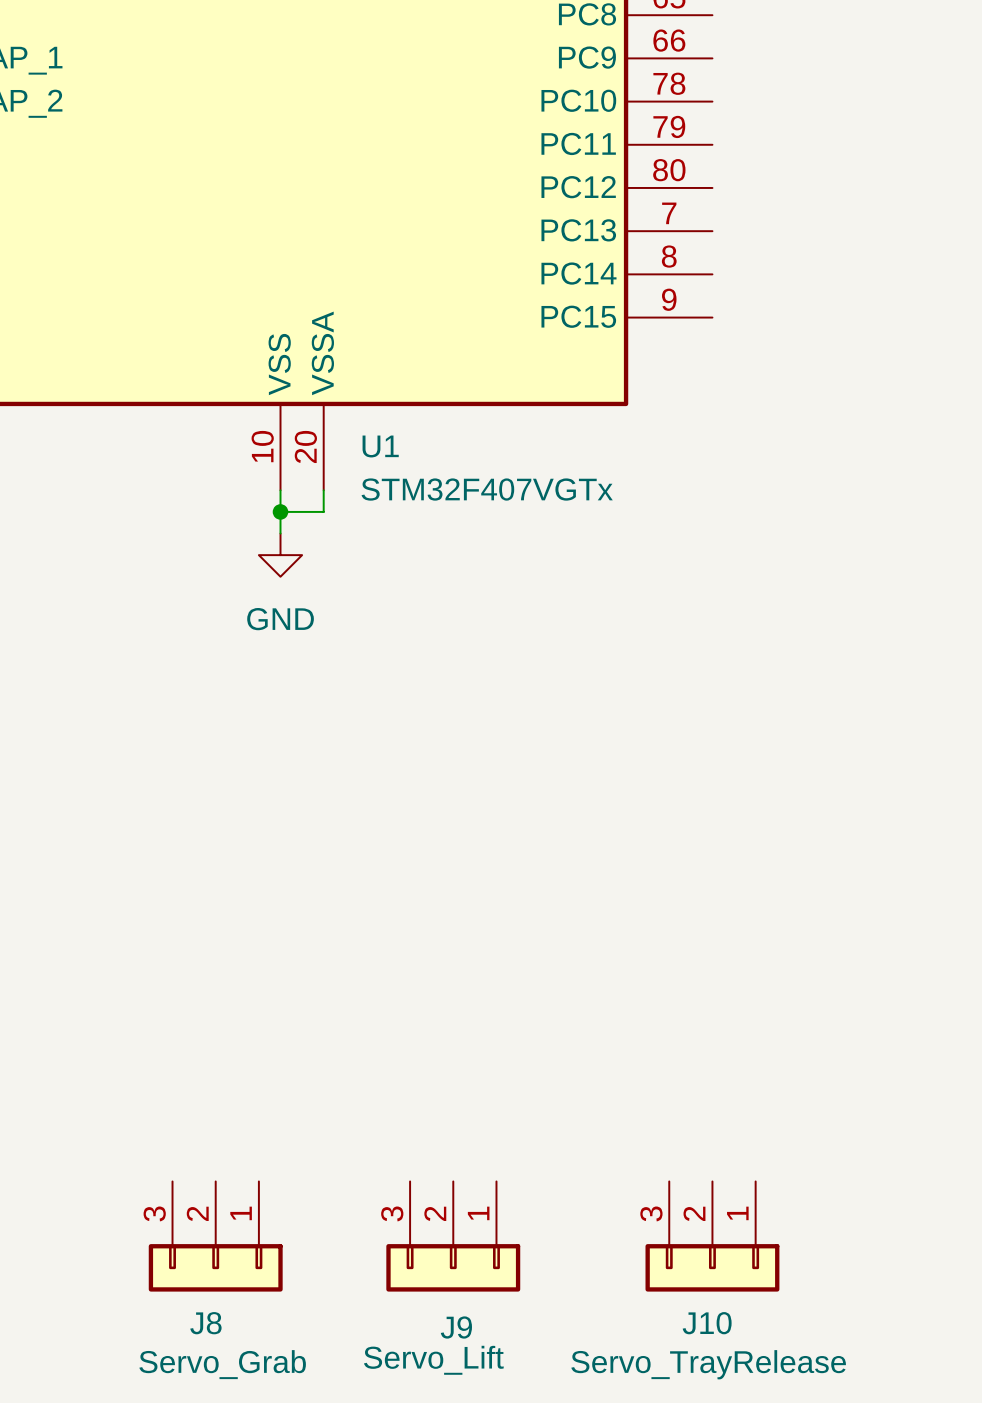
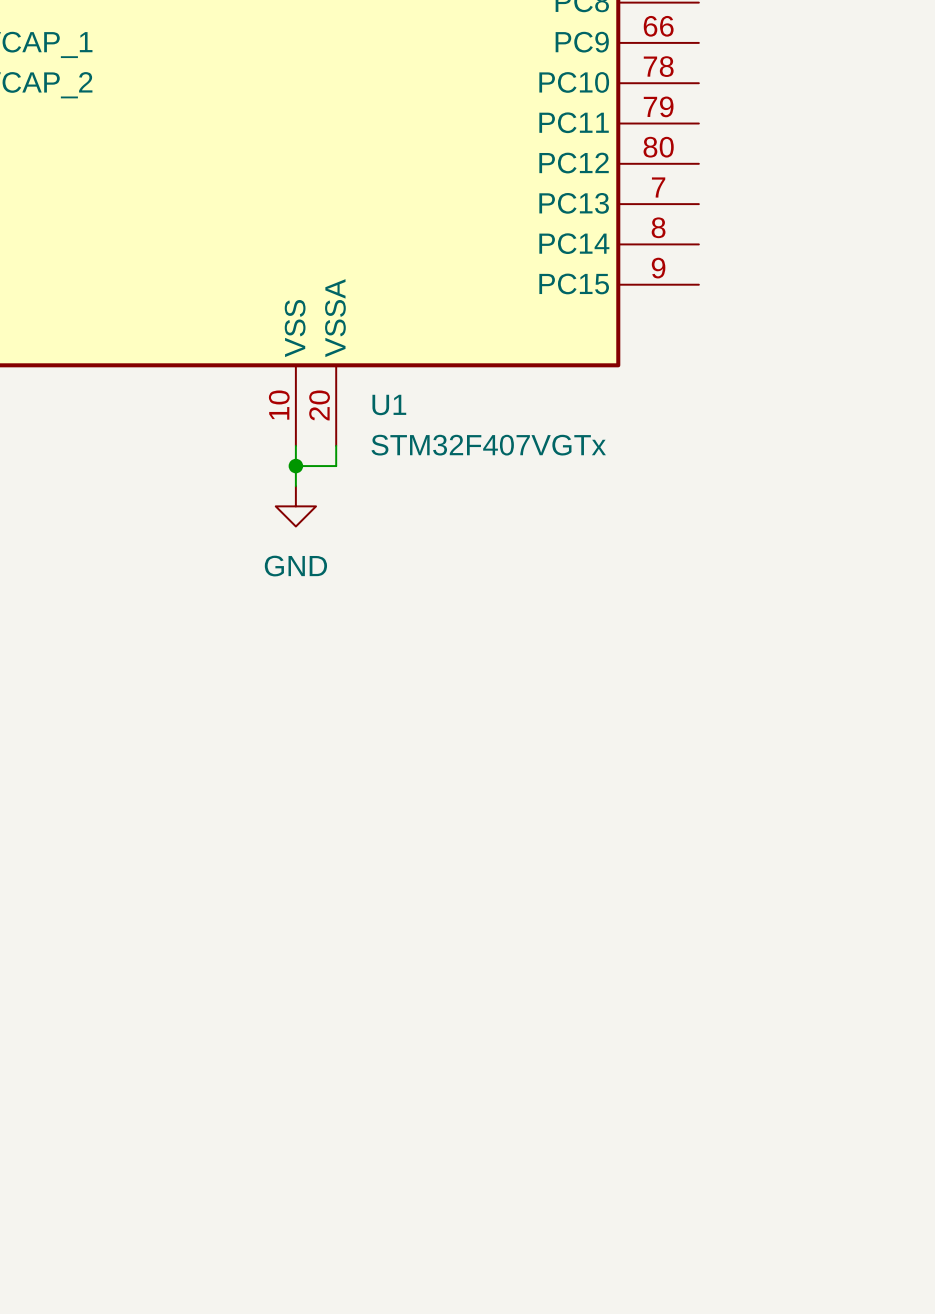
J8: Servo_Grab (215, 1236) -> none
J9: Servo_Lift (453, 1236) -> none
J10: Servo_TrayRelease (712, 1236) -> none

